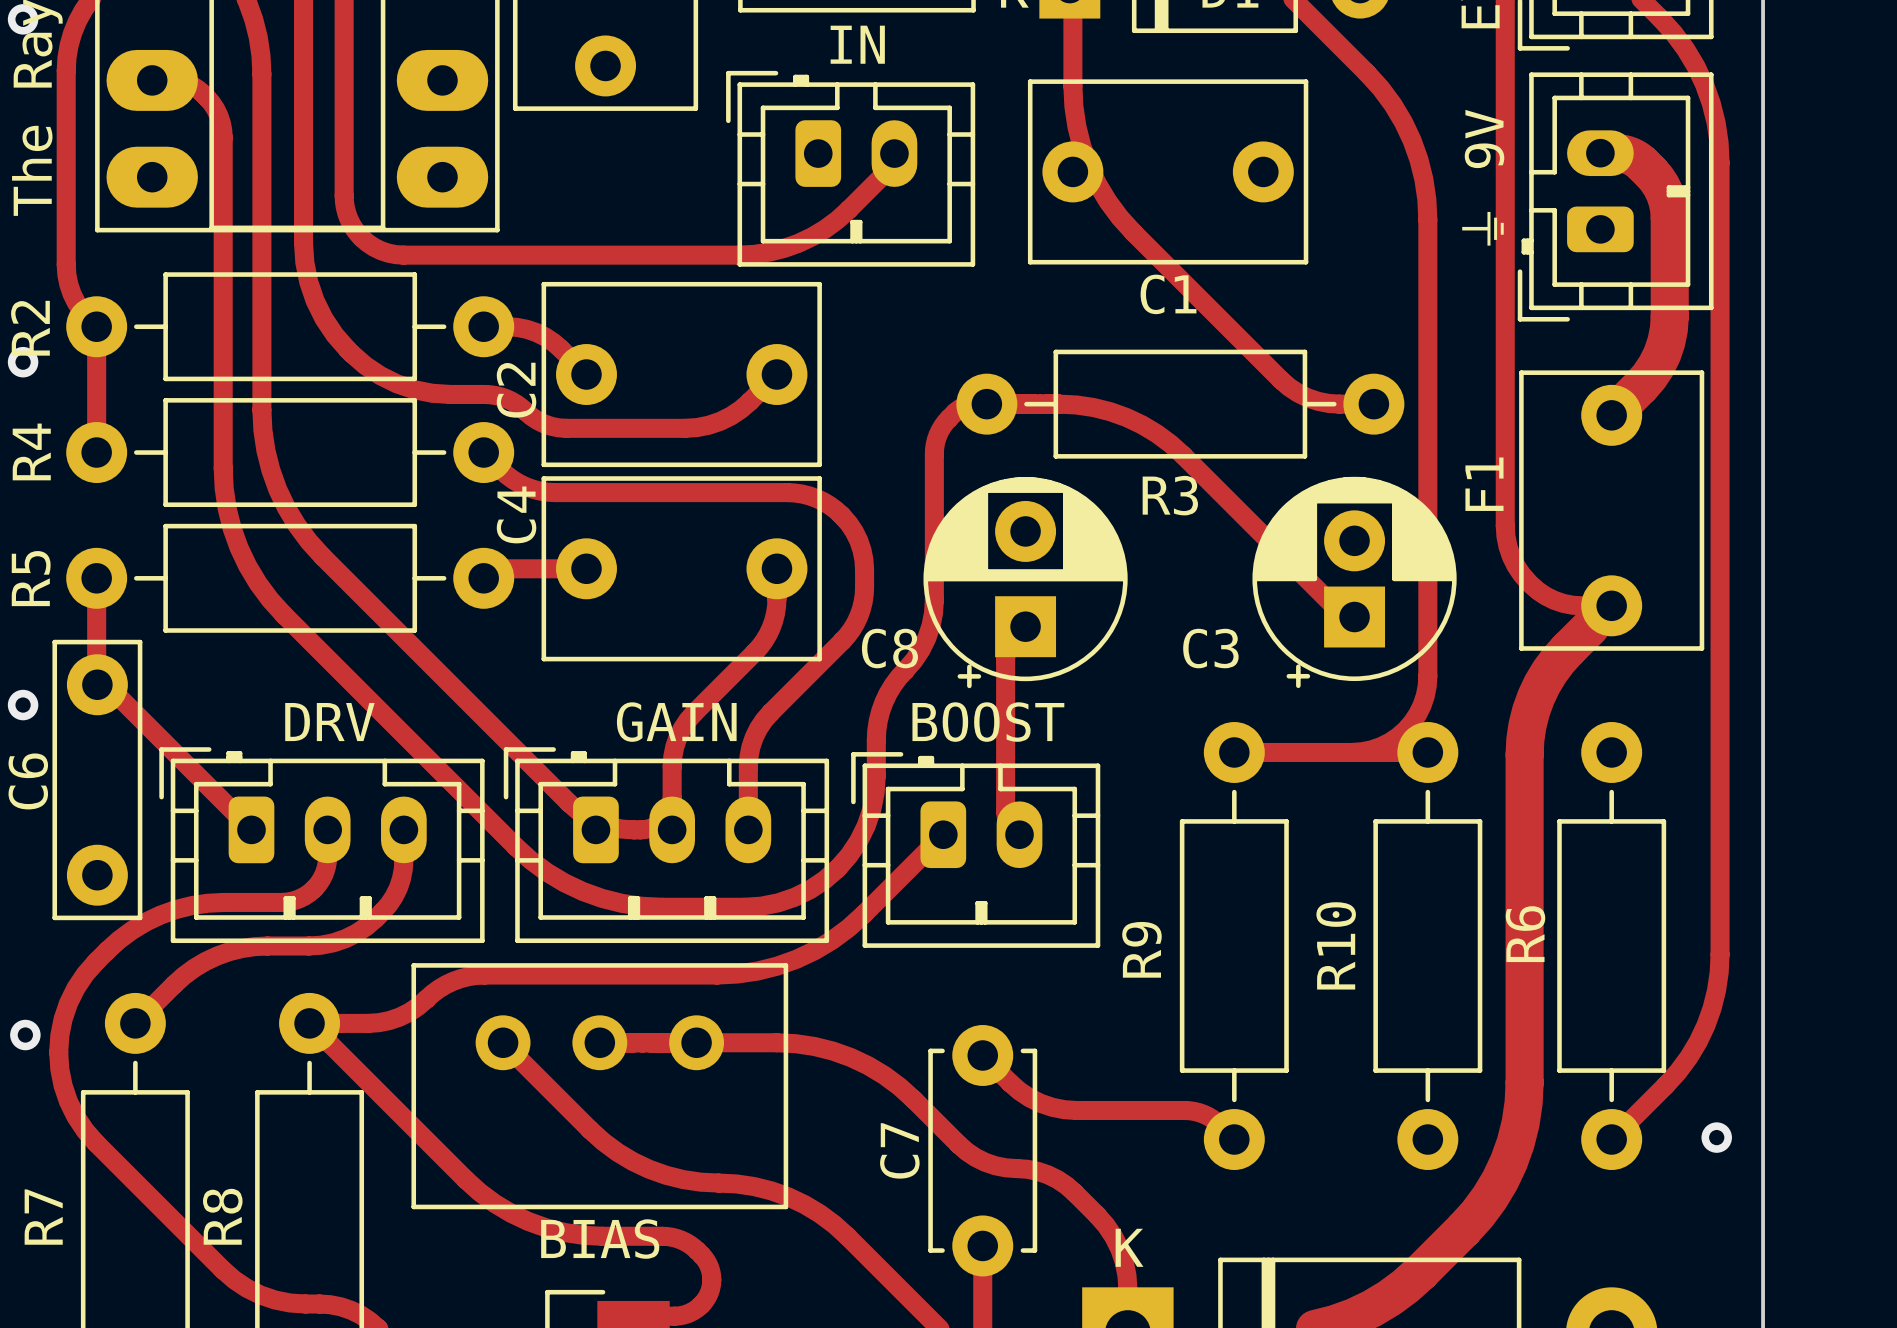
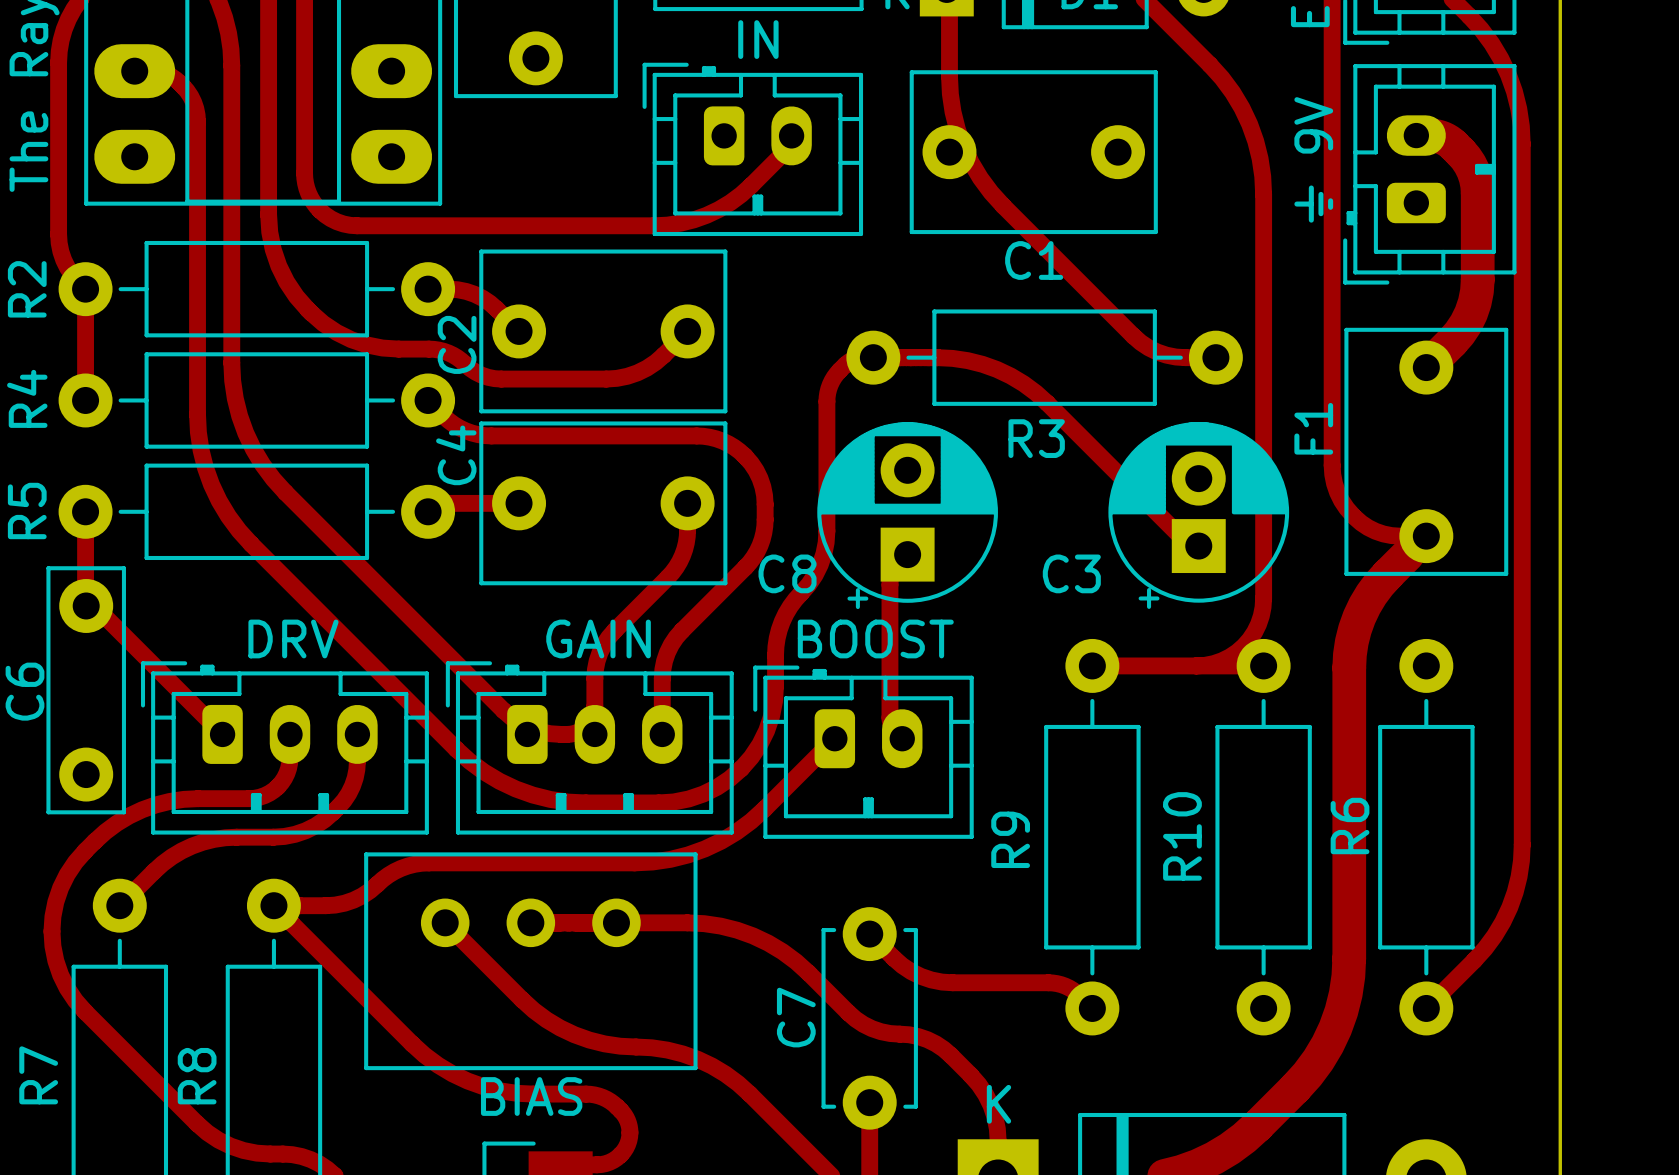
via: (23, 19) -> none
via: (23, 362) -> none
via: (23, 705) -> none
via: (25, 1035) -> none
via: (1716, 1137) -> none

